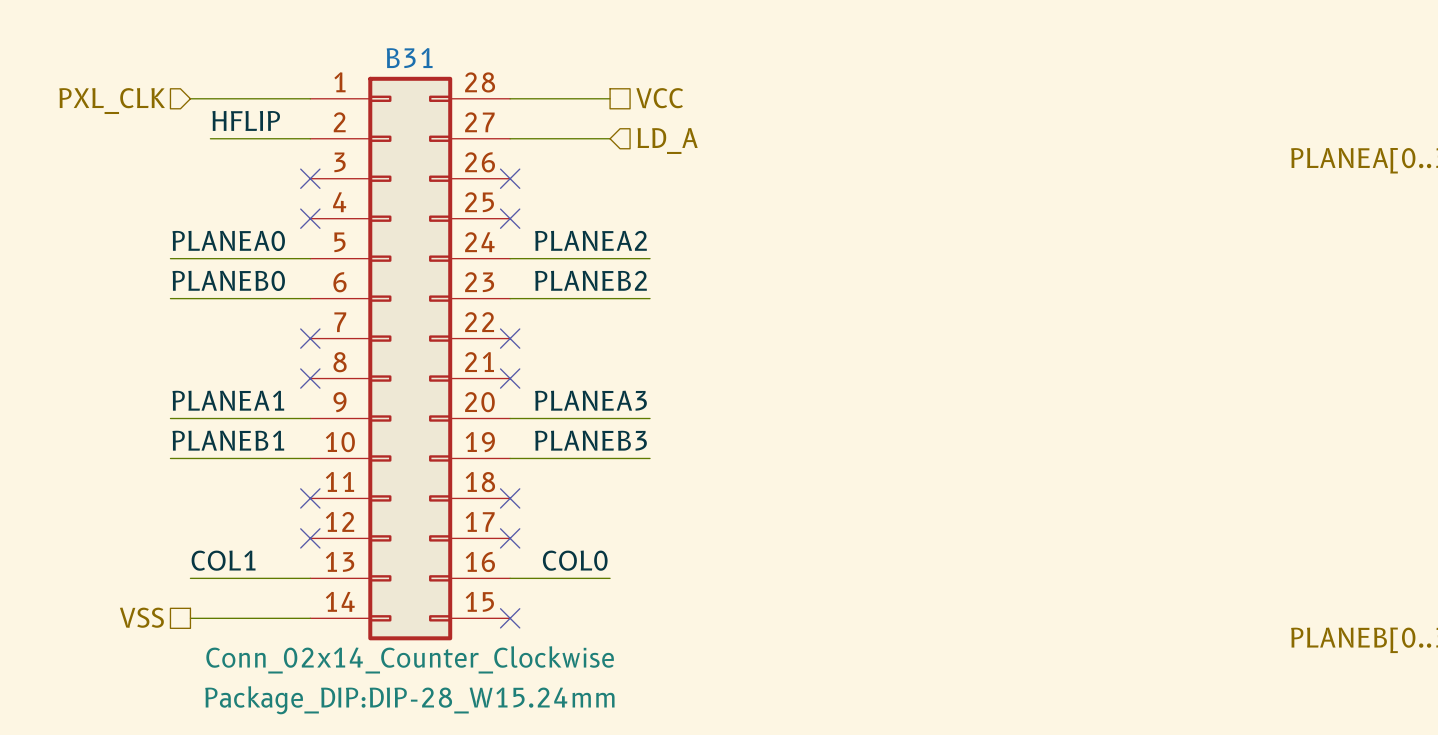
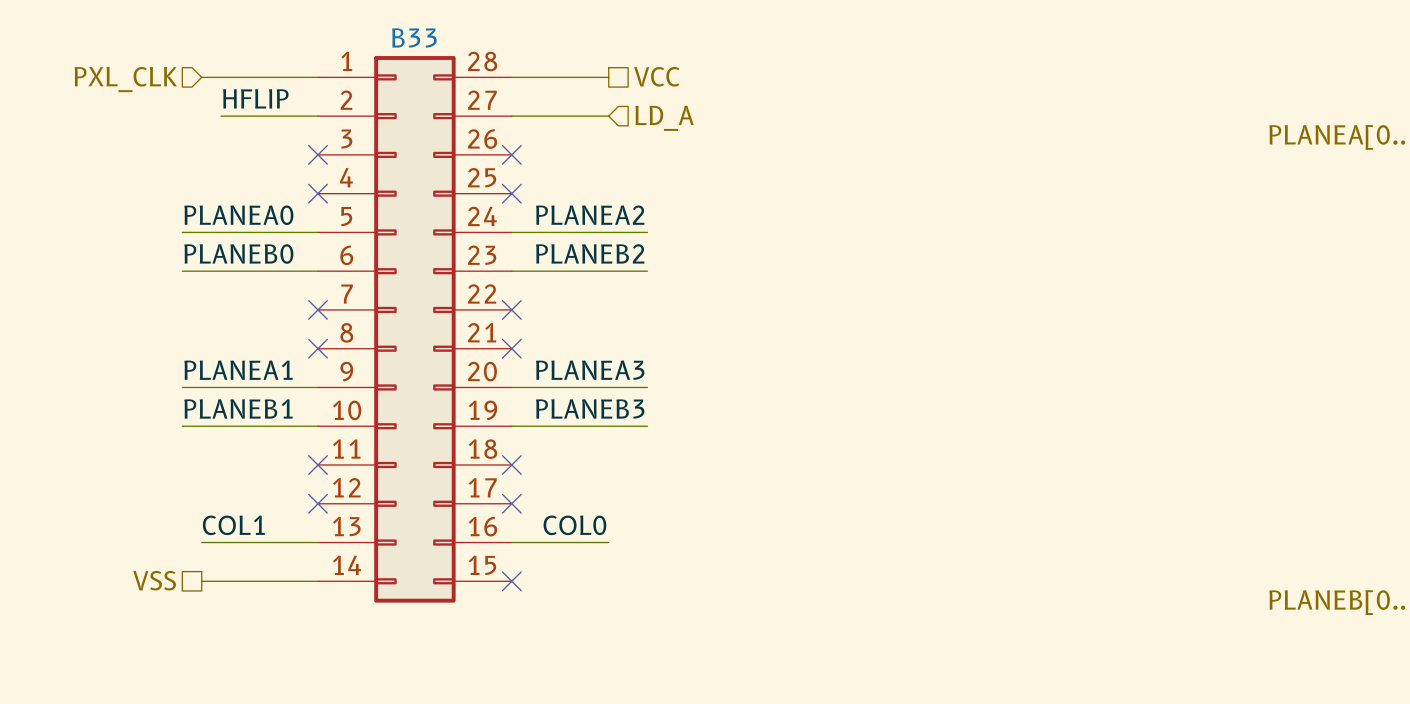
B31 name: B31 (409, 58) -> B33 (414, 37)
B31 value: Conn_02x14_Counter_Clockwise (410, 659) -> none
B31 text: Package_DIP:DIP-28_W15.24mm (409, 700) -> none

